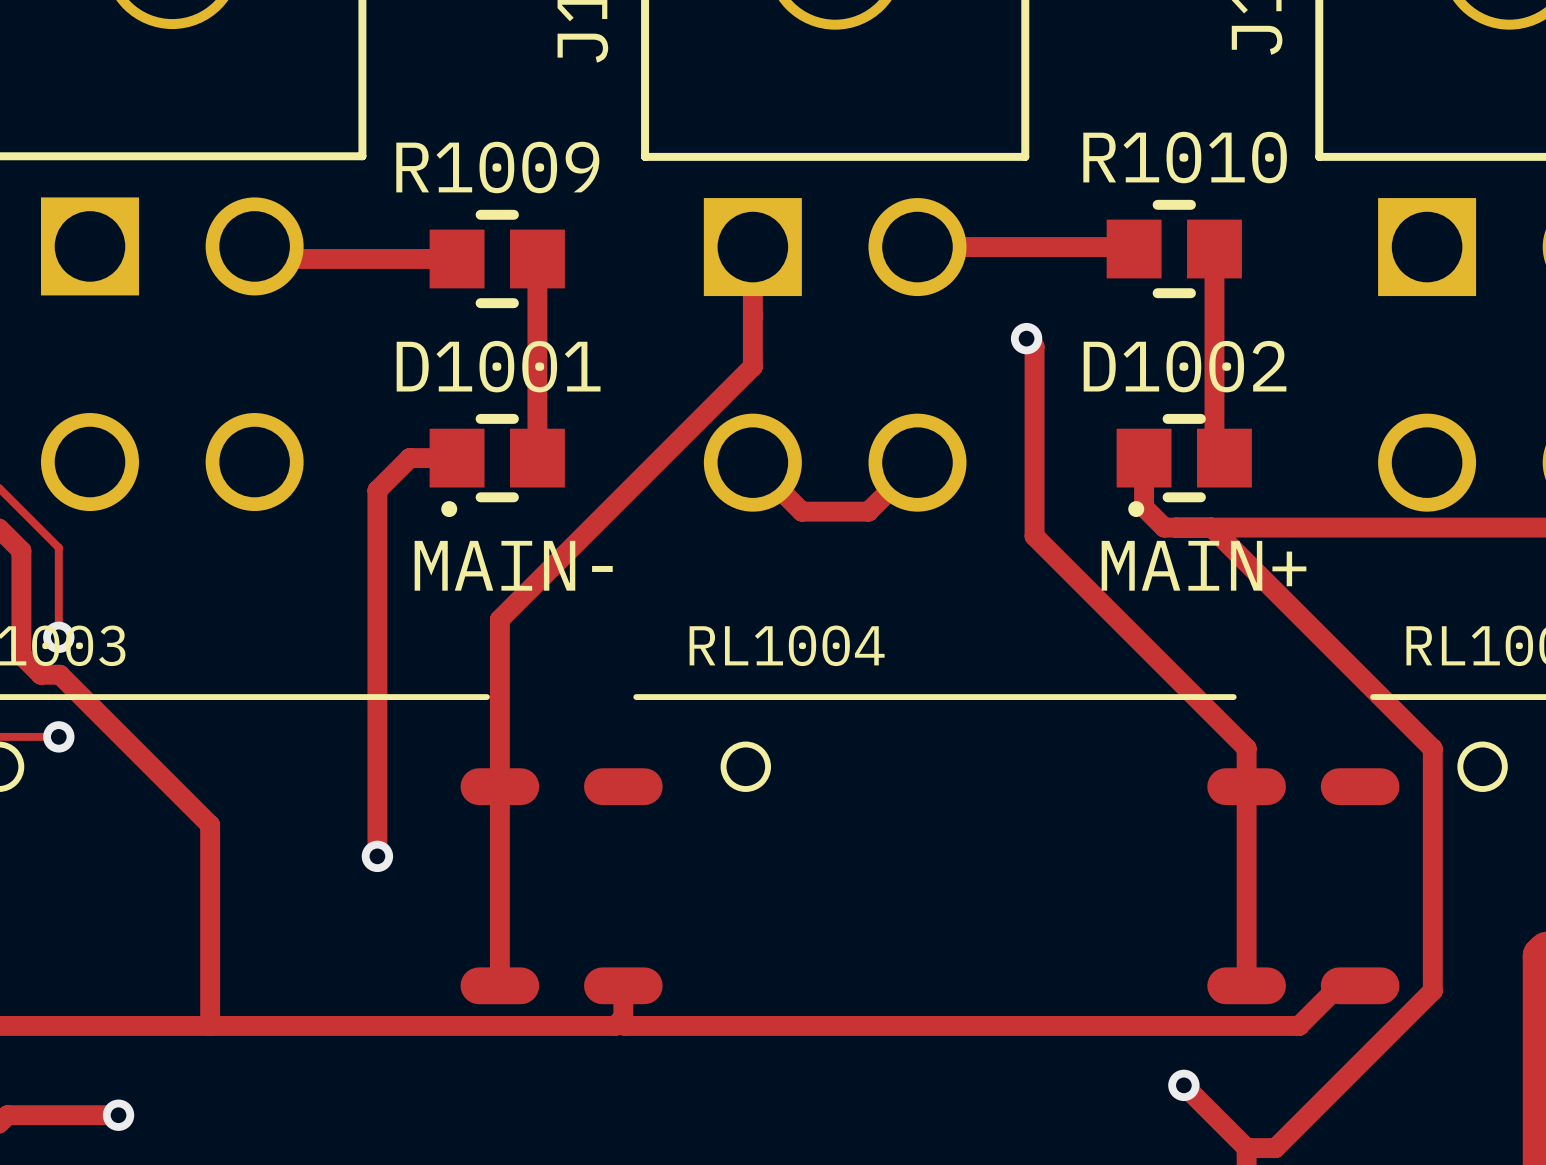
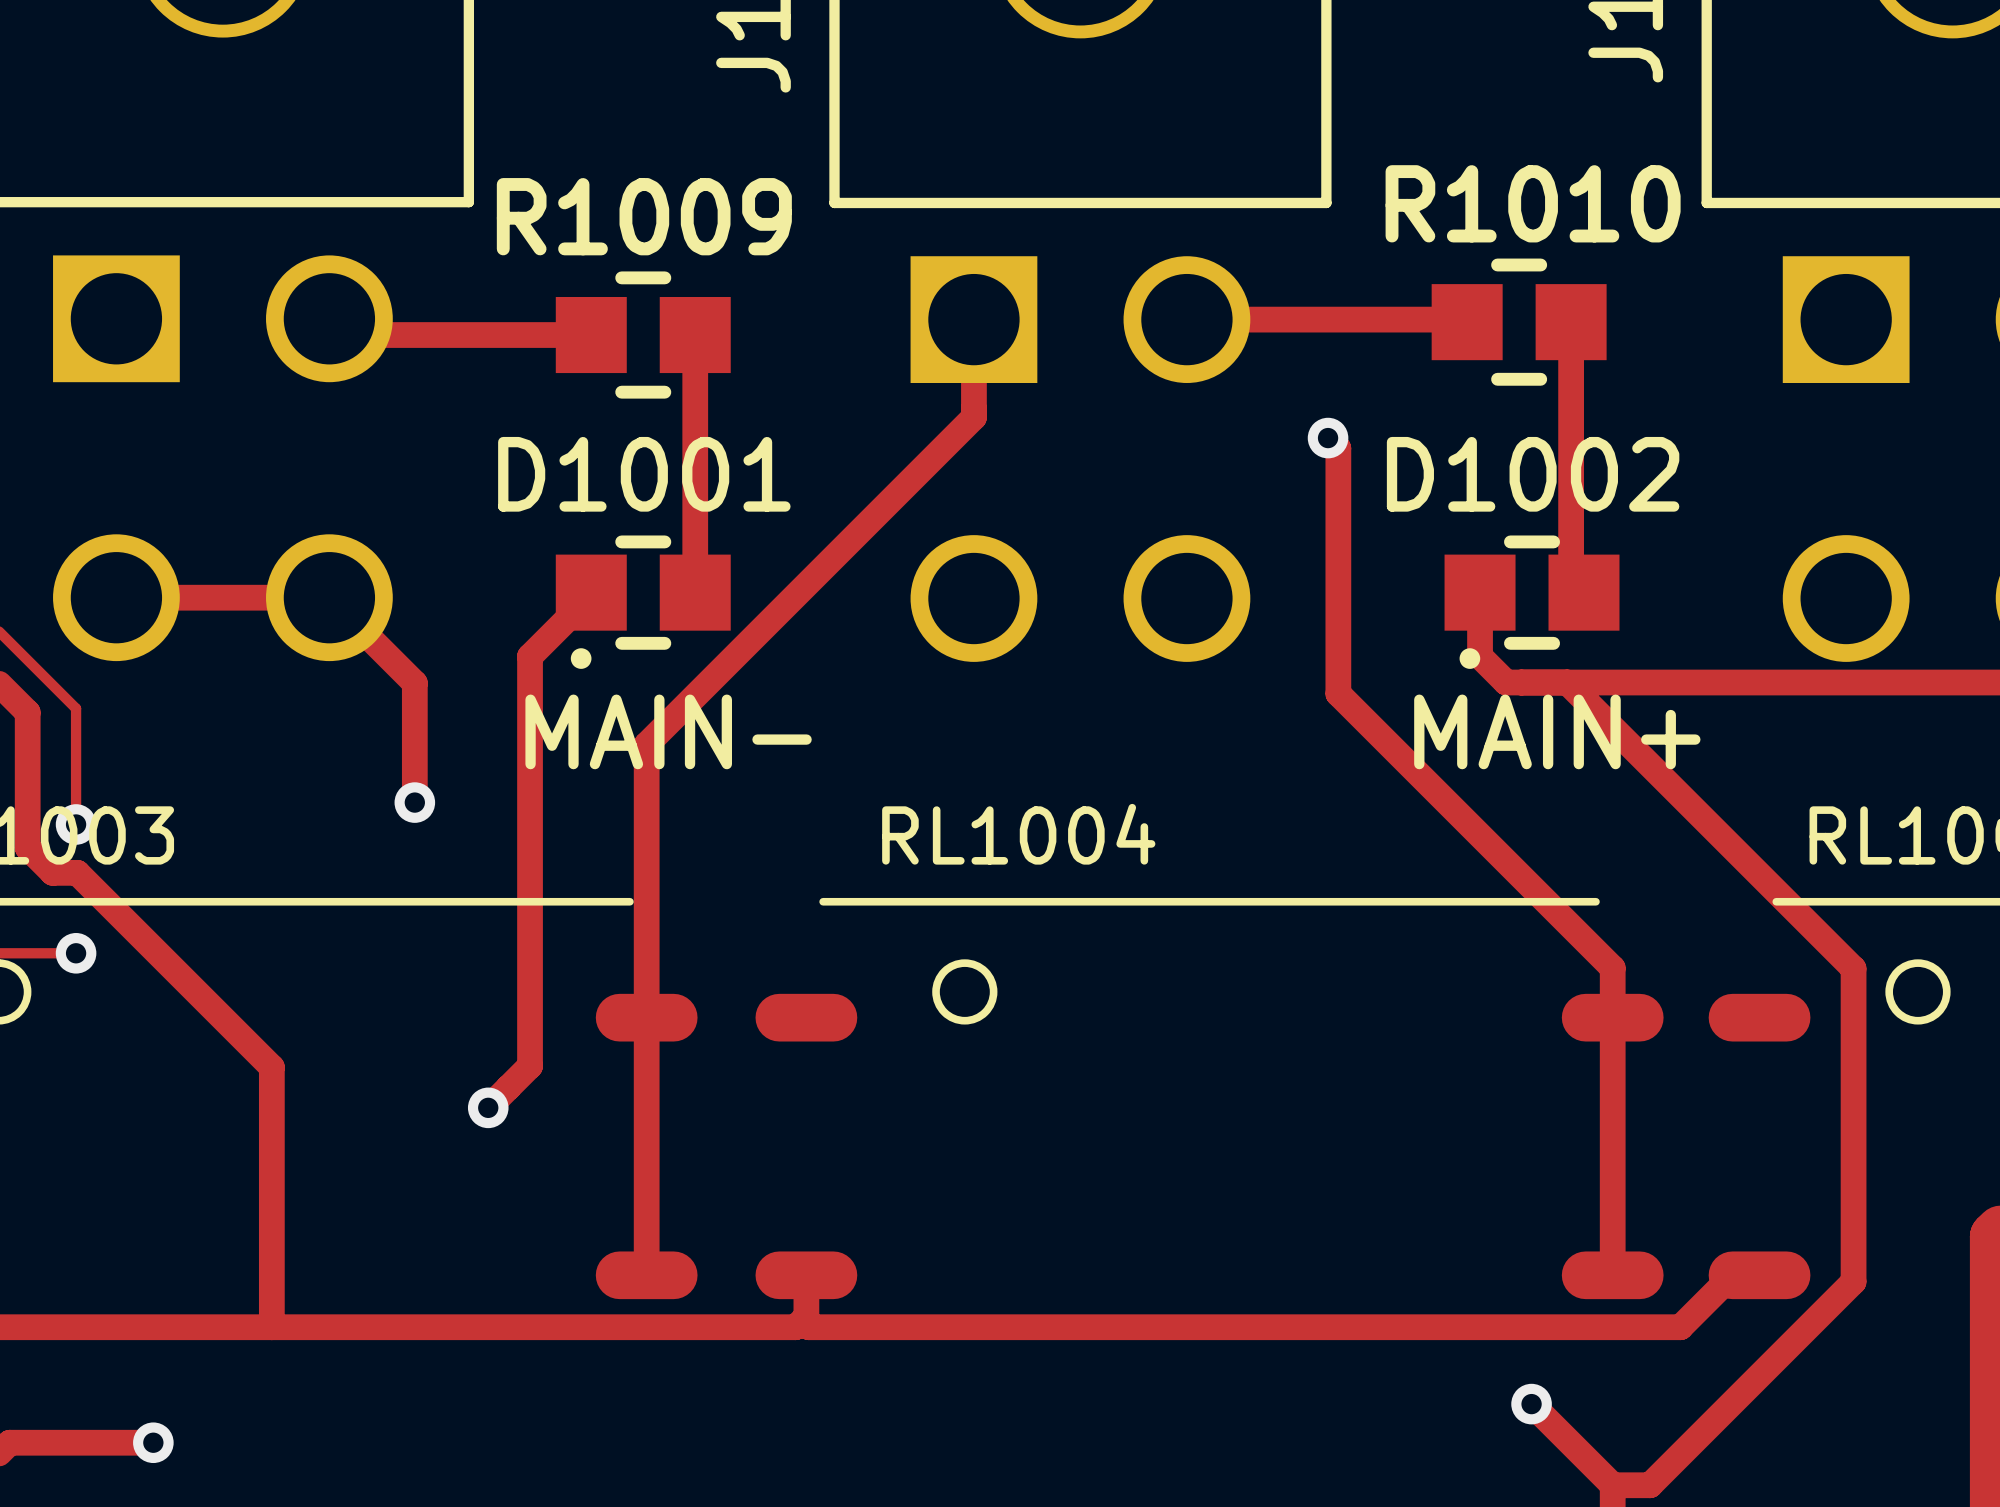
track: (752, 322) (752, 366) (499, 619) -> (973, 417) (646, 744) (646, 801)
track: (457, 458) (409, 458) (377, 490) (377, 856) -> (591, 592) (591, 595) (530, 656) (530, 1066) (488, 1107)
track: none -> (116, 597) (329, 597) (414, 683) (414, 802)
track: (752, 462) (801, 511) (868, 511) (917, 462) -> none
via: none -> (414, 802)

